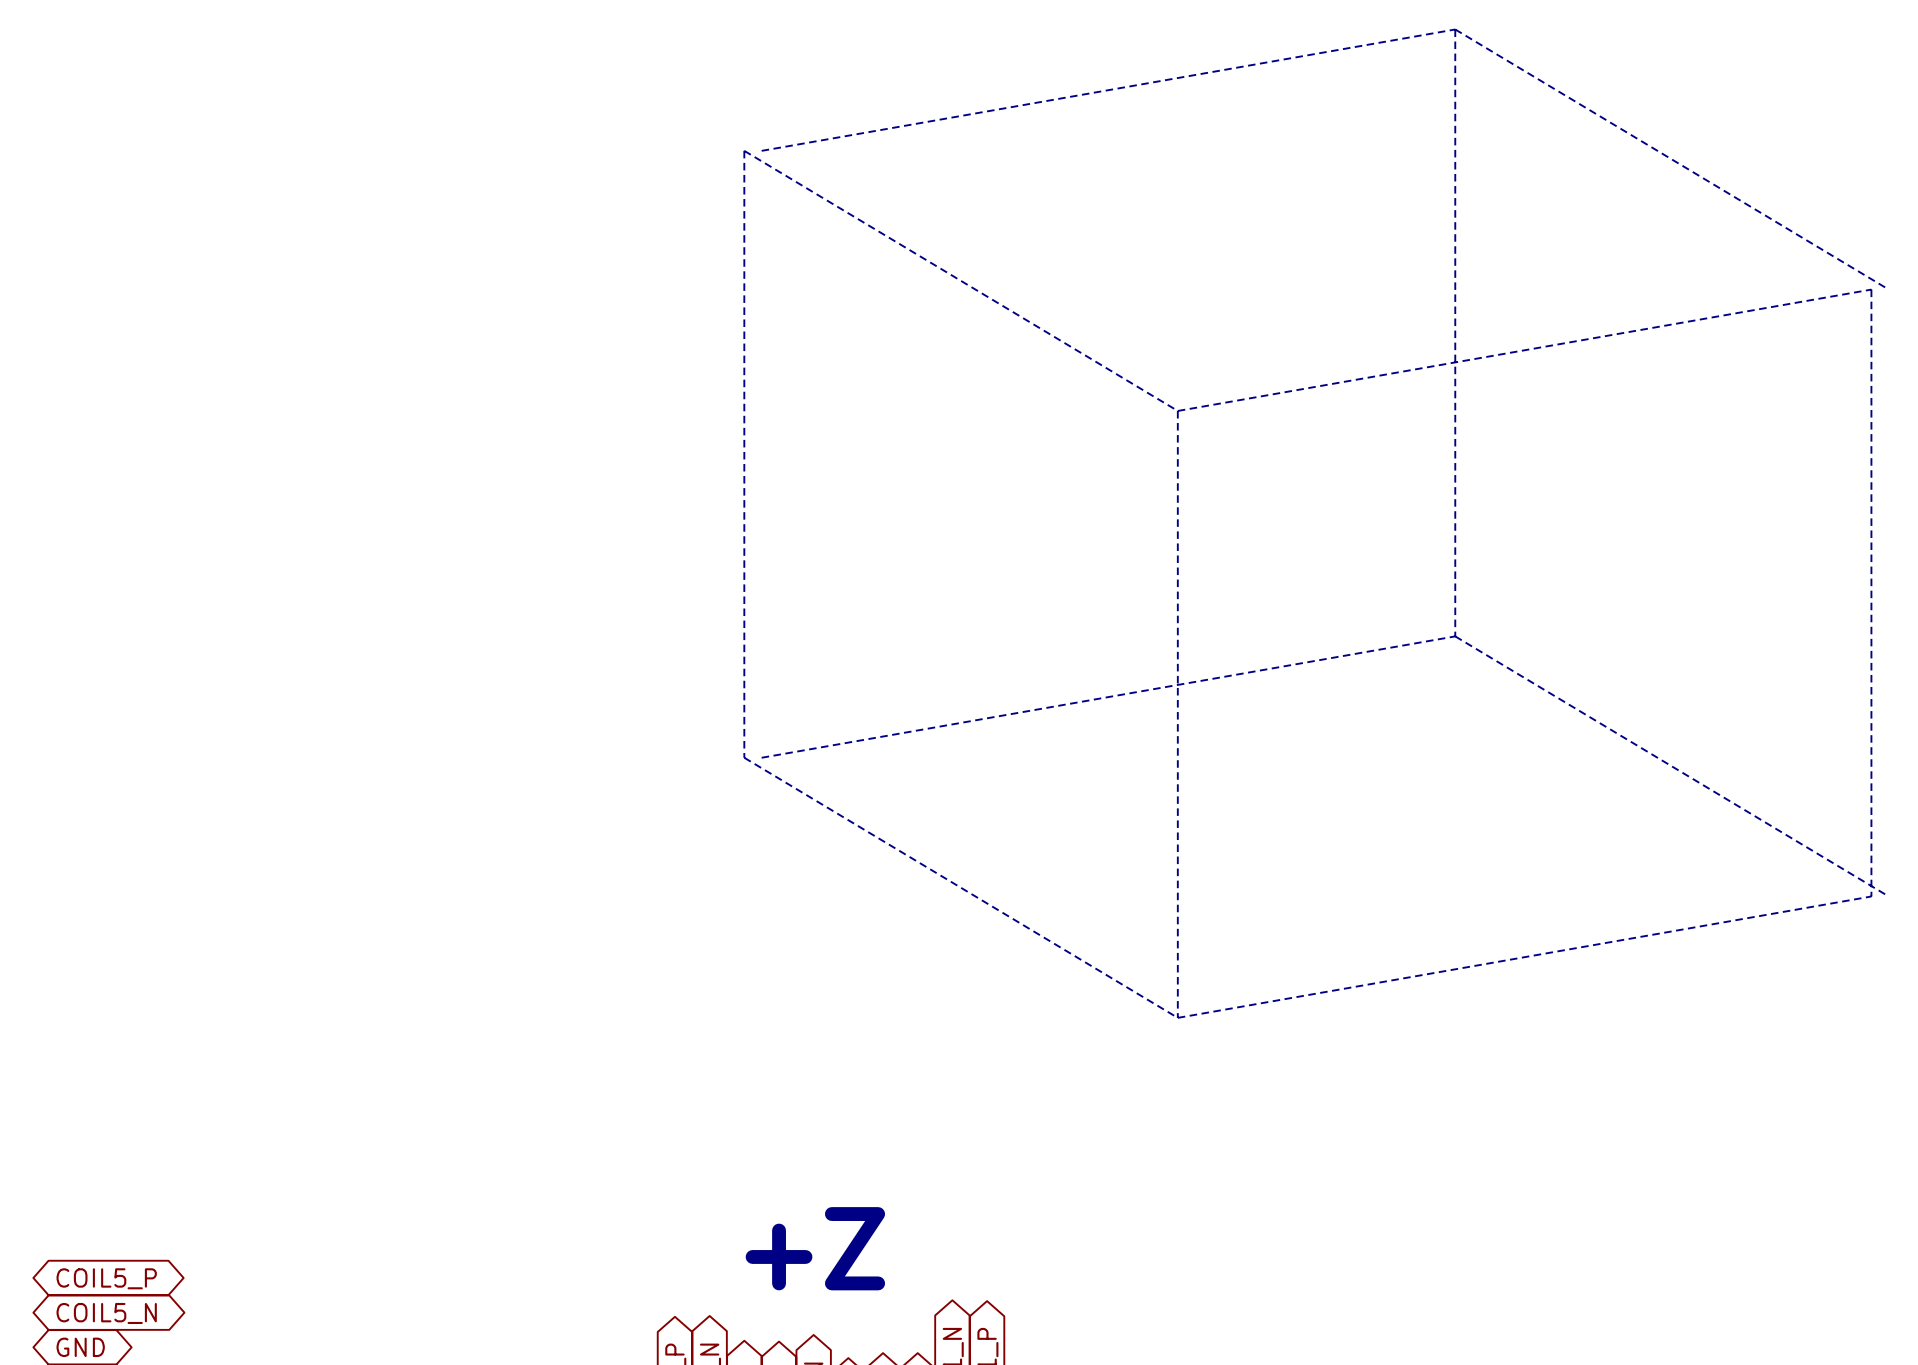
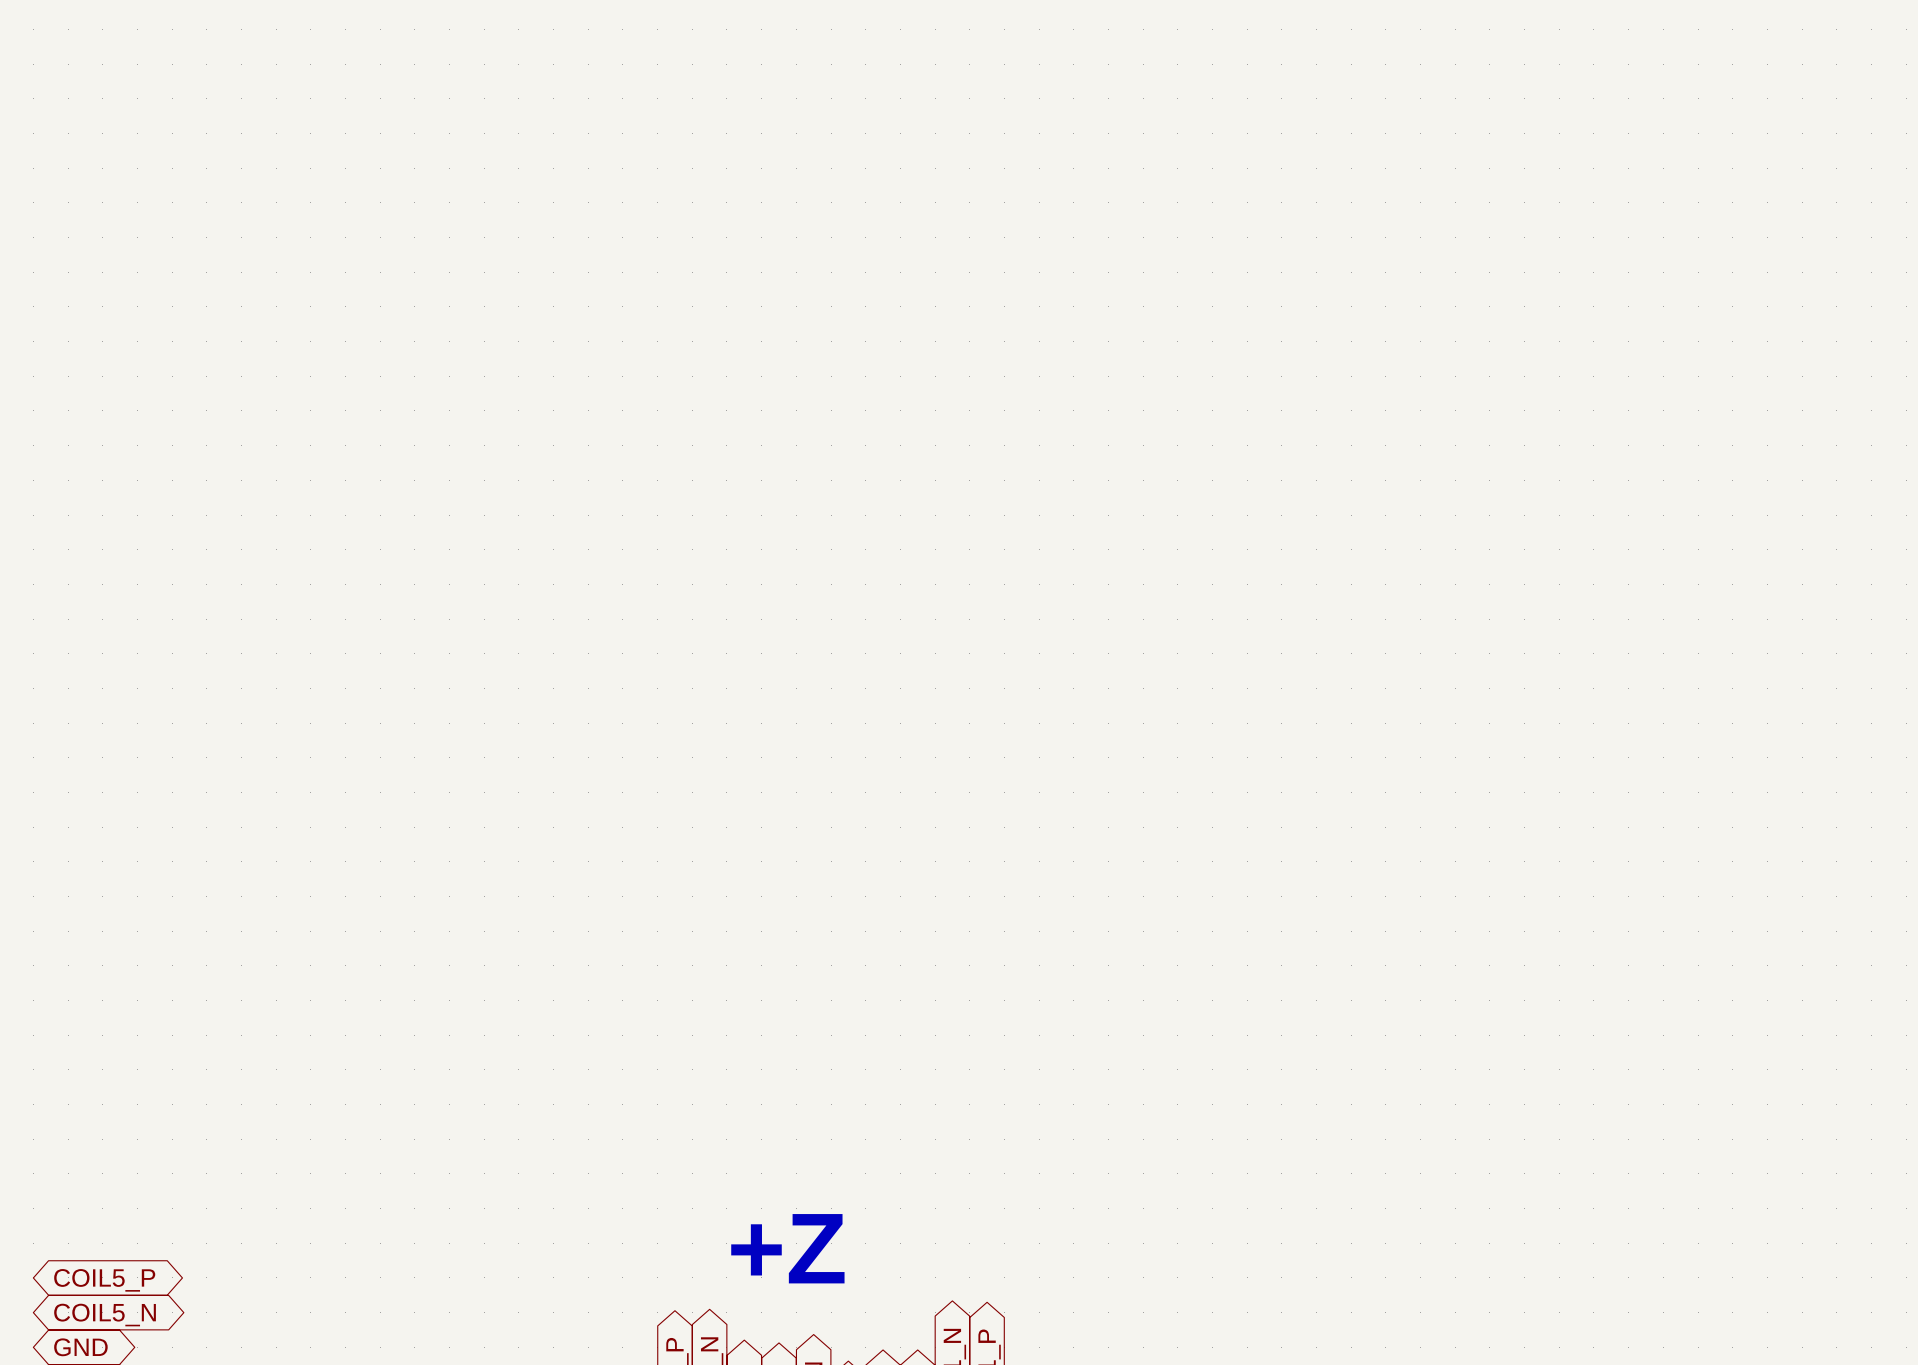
line: (1455, 29) (761, 150) -> none
line: (1455, 29) (1888, 289) -> none
line: (1455, 29) (1455, 636) -> none
line: (1177, 410) (744, 150) (744, 757) (1177, 1017) -> none
line: (1177, 410) (1871, 289) (1871, 896) (1177, 1017) -> none
line: (1177, 410) (1177, 1017) -> none
line: (1455, 636) (761, 757) -> none
line: (1455, 636) (1888, 896) -> none

